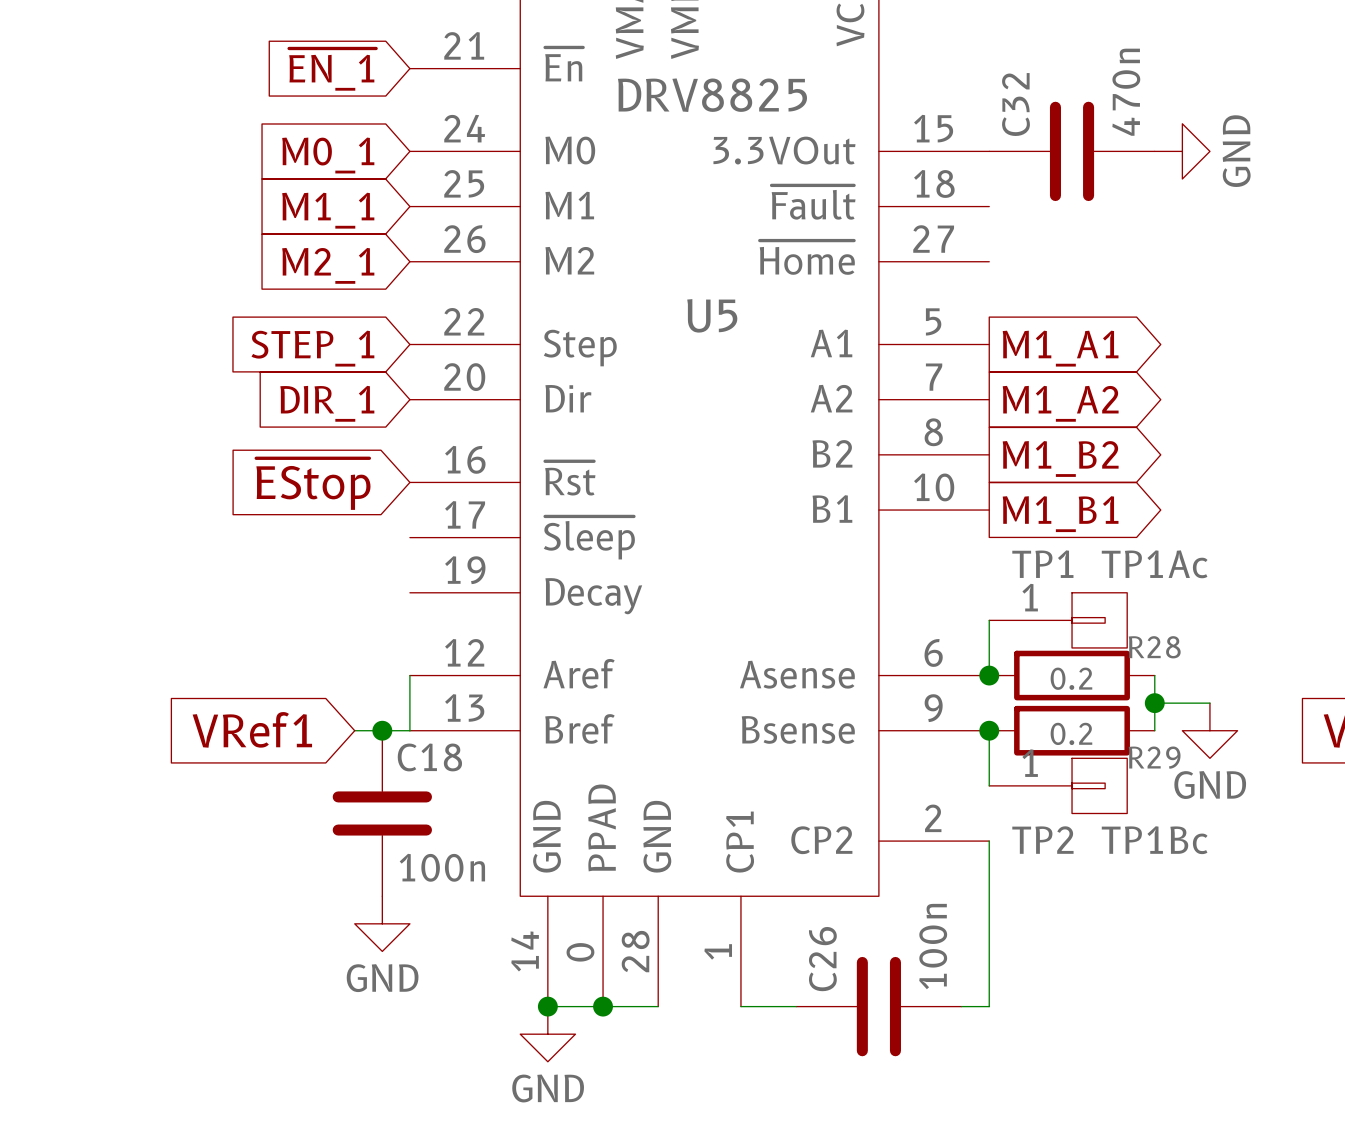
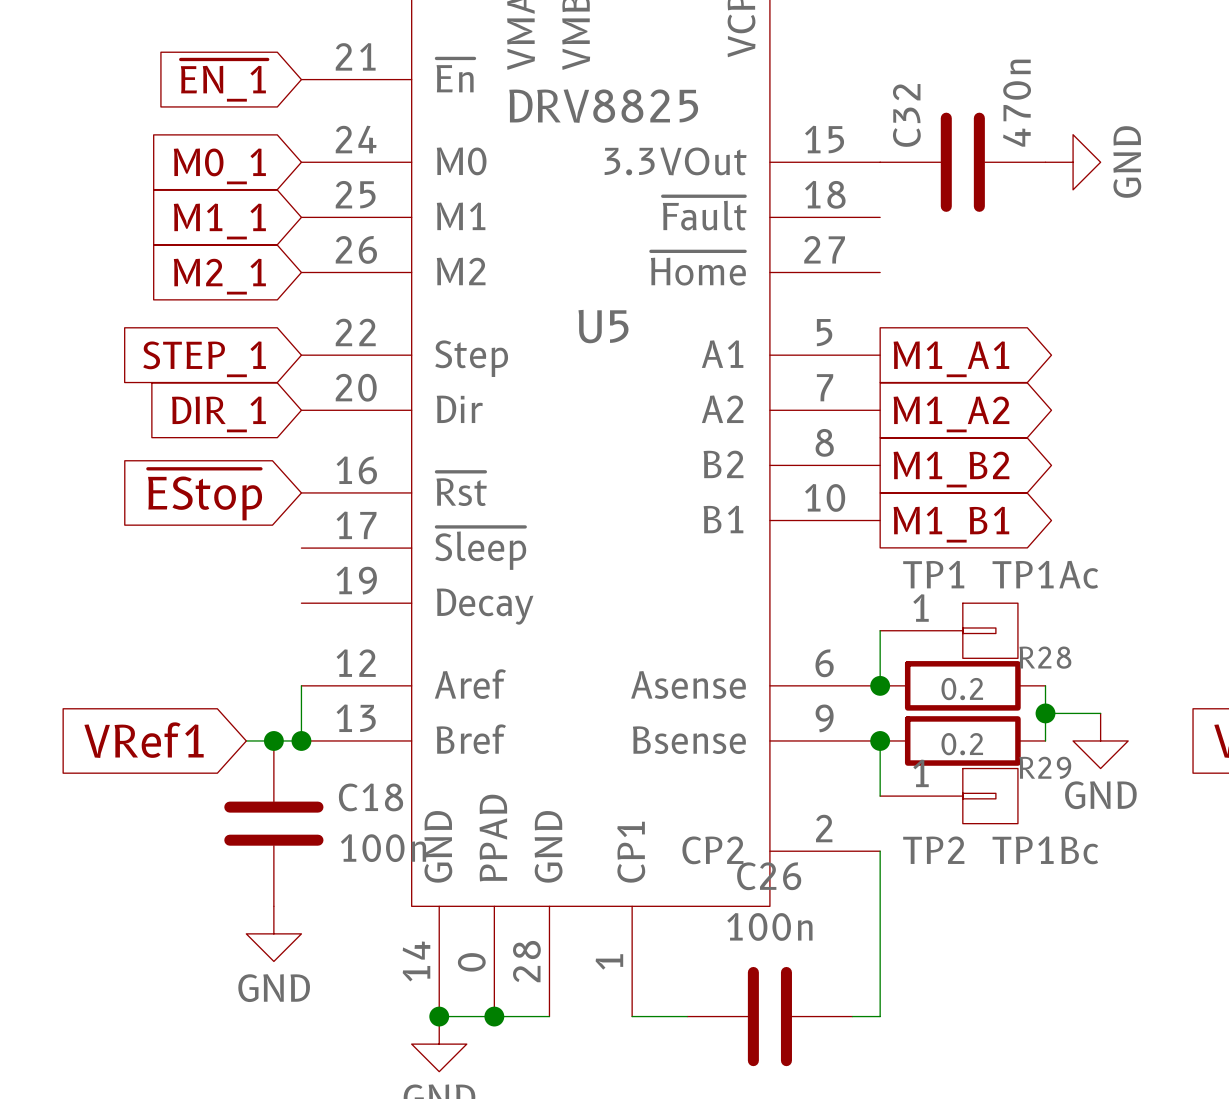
junction: none -> (301, 740)
C18 name position: C18 (429, 757) -> C18 (371, 797)
C18 value position: 100n (442, 867) -> 100n (383, 848)
C26 value rotation: 0° (933, 946) -> 90° clockwise (769, 926)
C26 name rotation: 0° (822, 959) -> 90° clockwise (769, 876)

